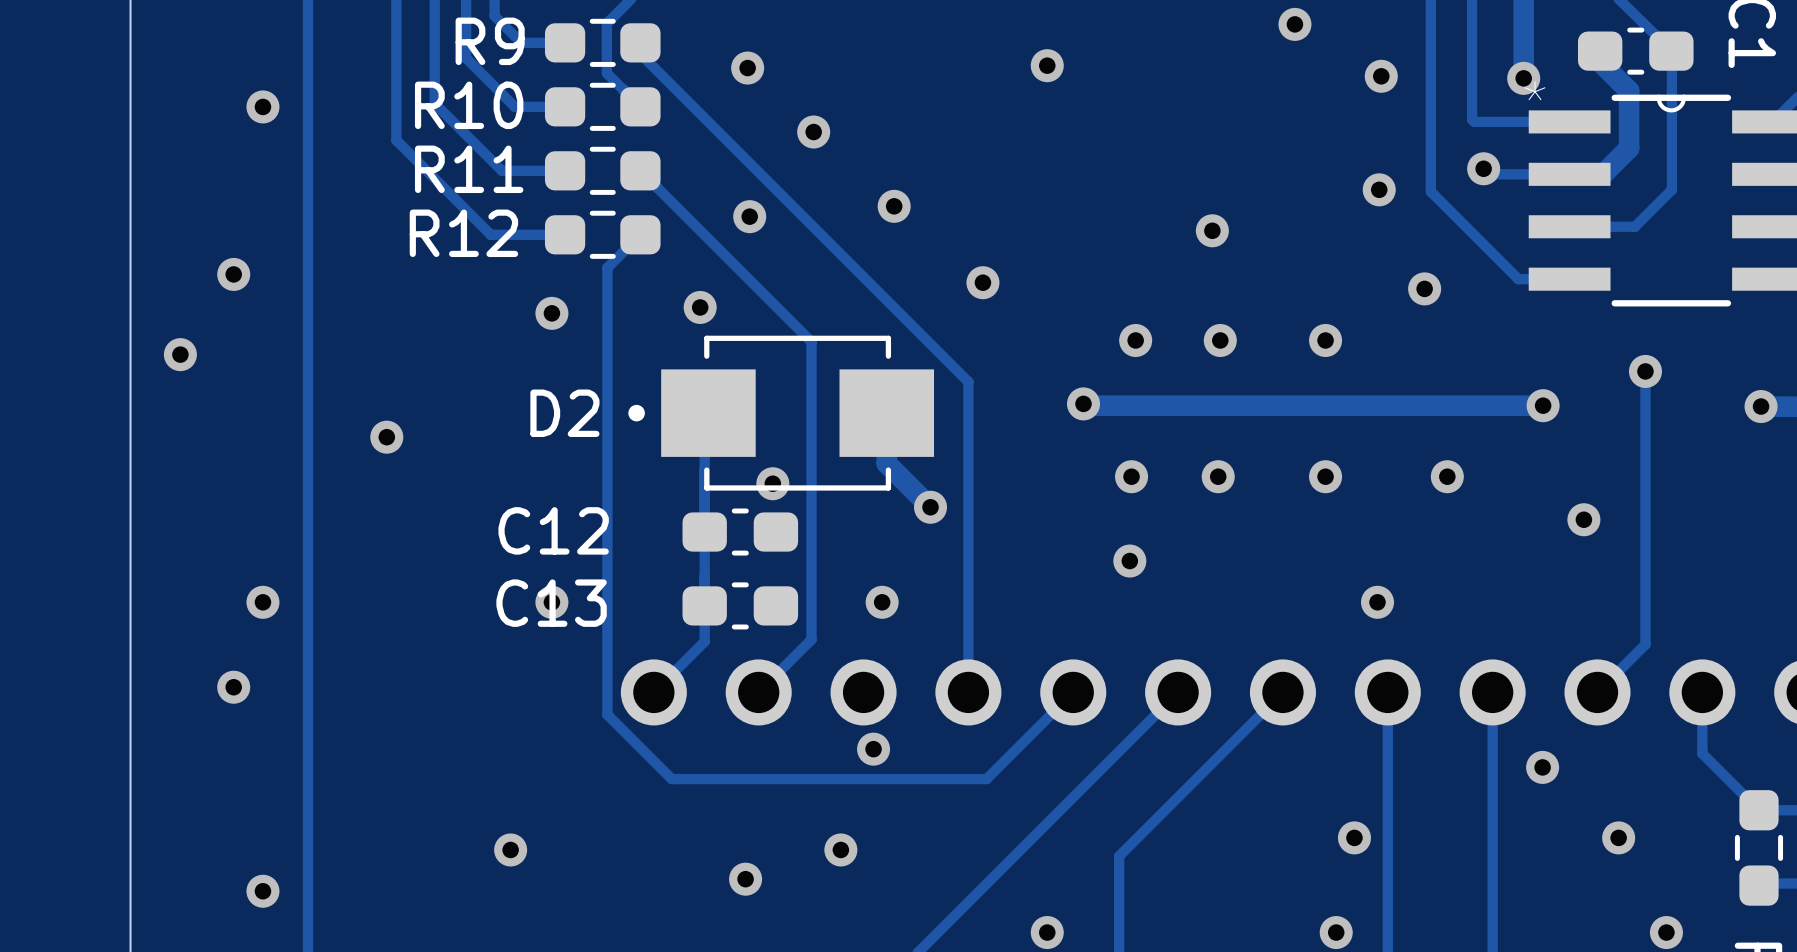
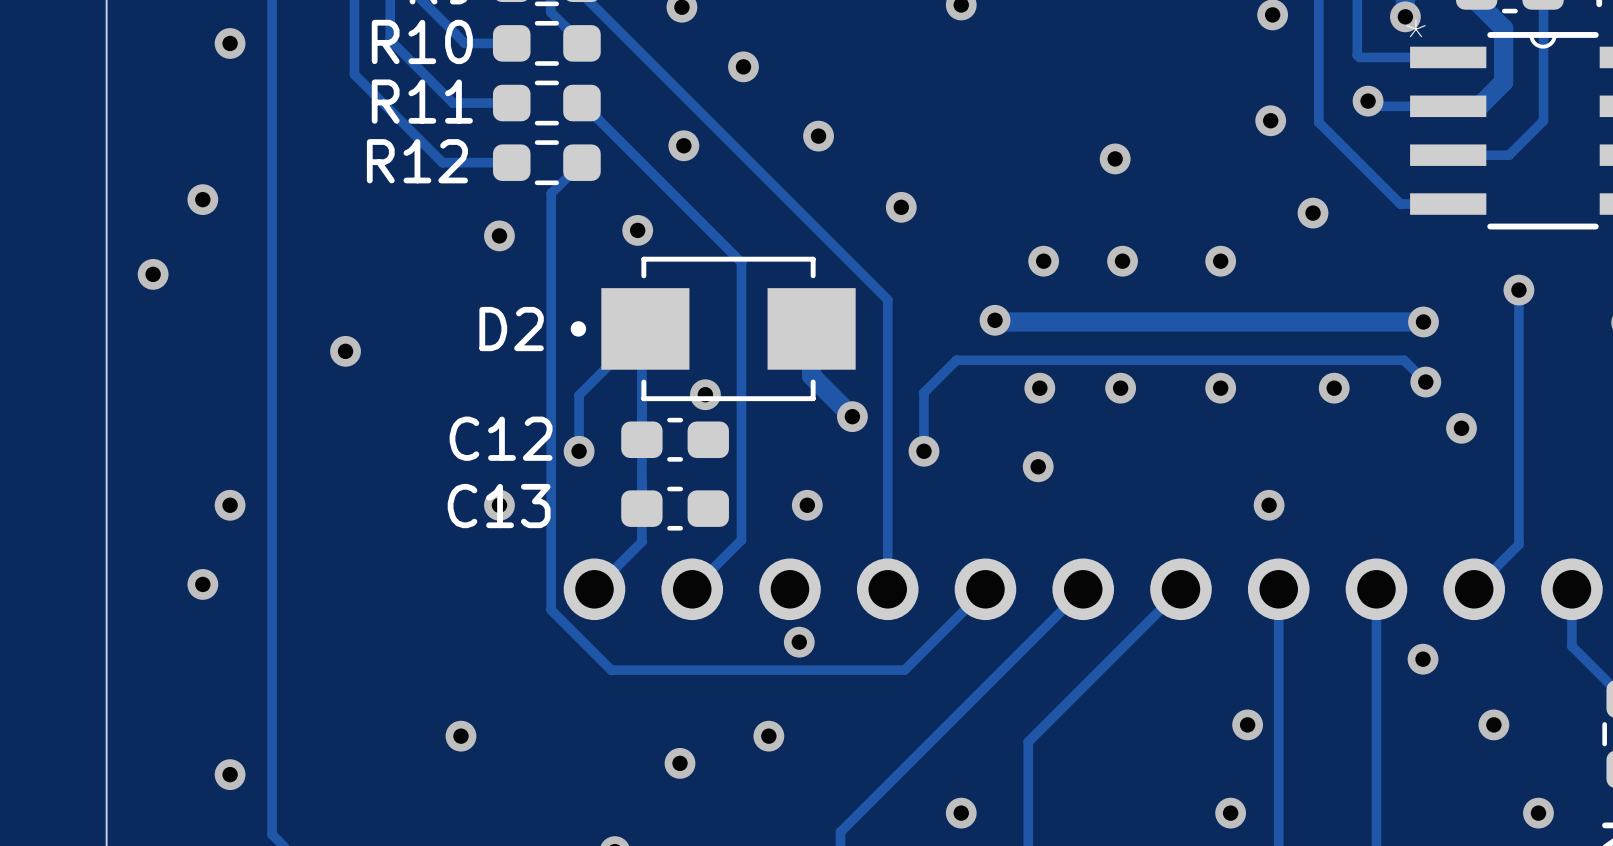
track: none -> (641, 332) (579, 395) (579, 451)
track: none -> (1425, 382) (1404, 360) (956, 360) (923, 392) (923, 451)
via: none -> (1425, 382)
via: none -> (579, 451)
via: none -> (923, 451)

